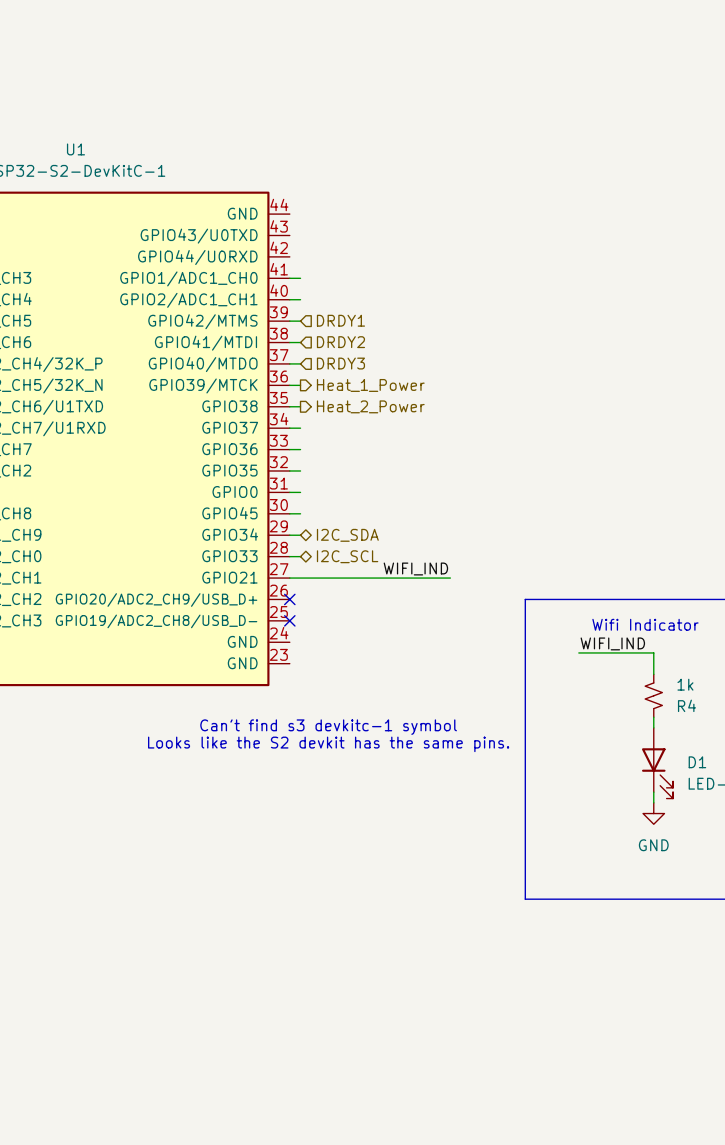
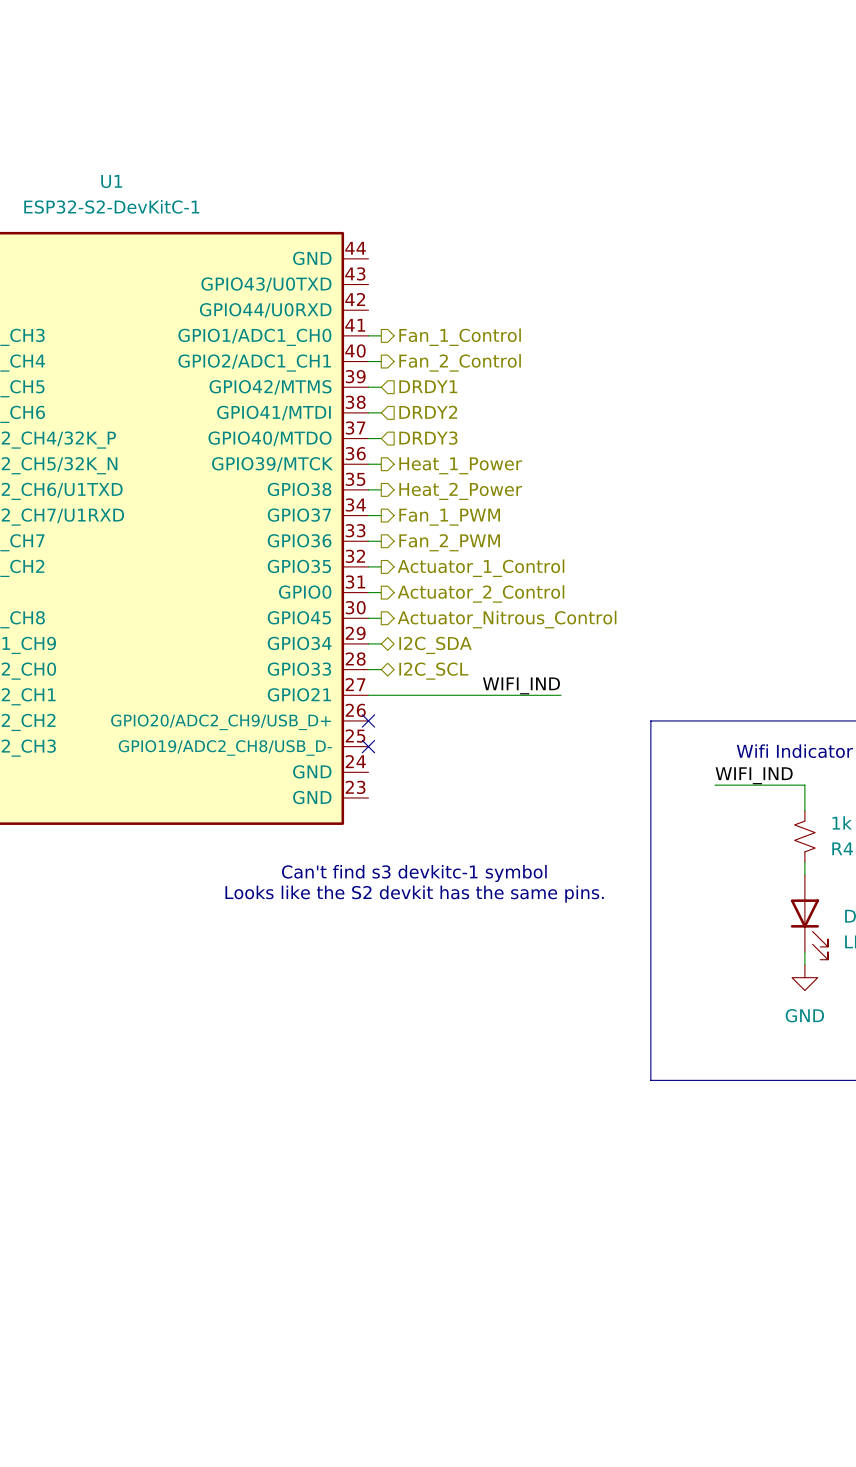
hierarchical label: none -> Fan_1_Control (460, 337)
hierarchical label: none -> Fan_2_Control (460, 362)
hierarchical label: none -> Fan_1_PWM (449, 517)
hierarchical label: none -> Fan_2_PWM (449, 542)
hierarchical label: none -> Actuator_1_Control (481, 568)
hierarchical label: none -> Actuator_2_Control (481, 593)
hierarchical label: none -> Actuator_Nitrous_Control (507, 619)

